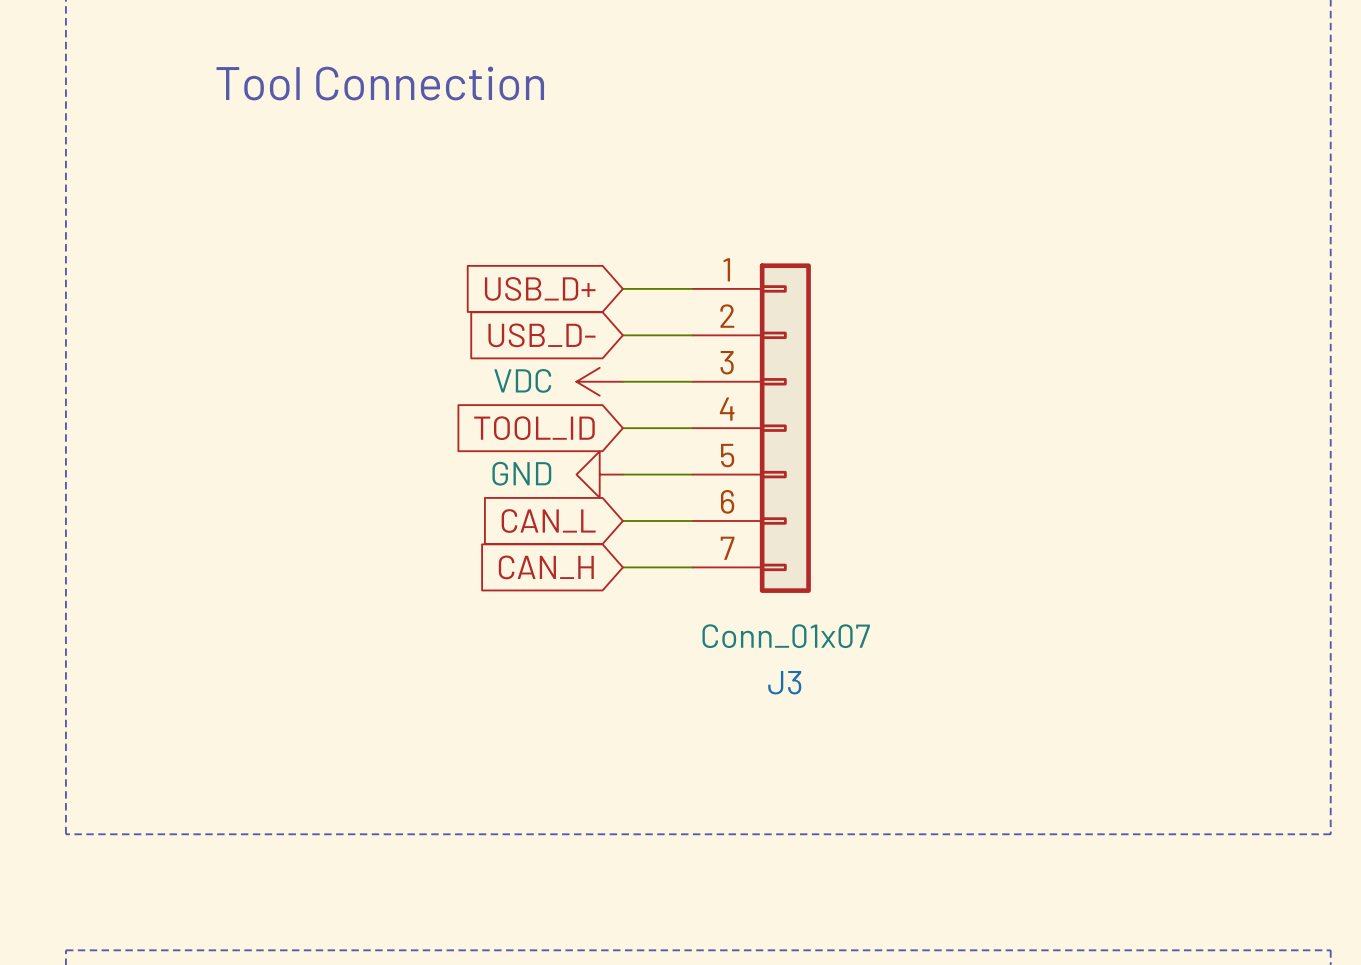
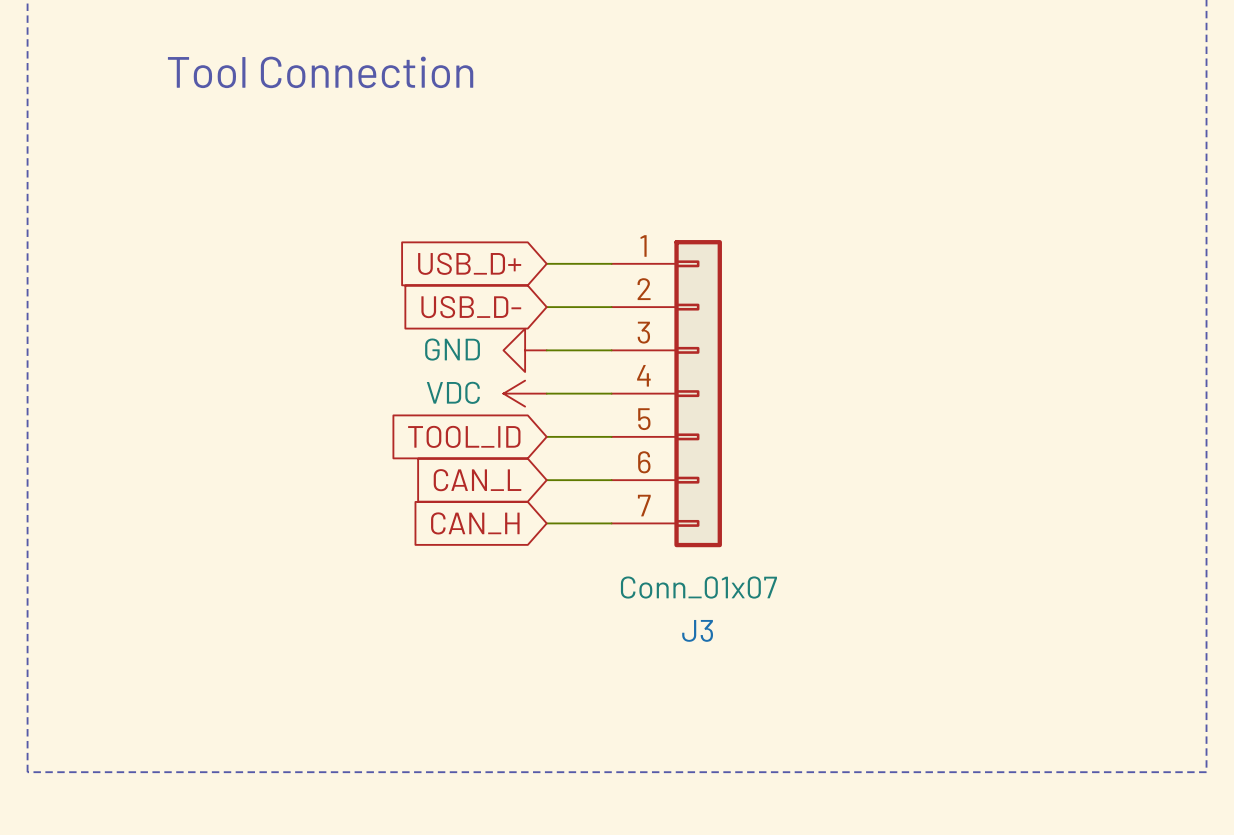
power symbol: VDC (599, 381) -> GND (525, 350)
global label position: TOOL_ID (534, 428) -> TOOL_ID (464, 436)
power symbol: none -> VDC (525, 393)
power symbol: GND (599, 474) -> none

